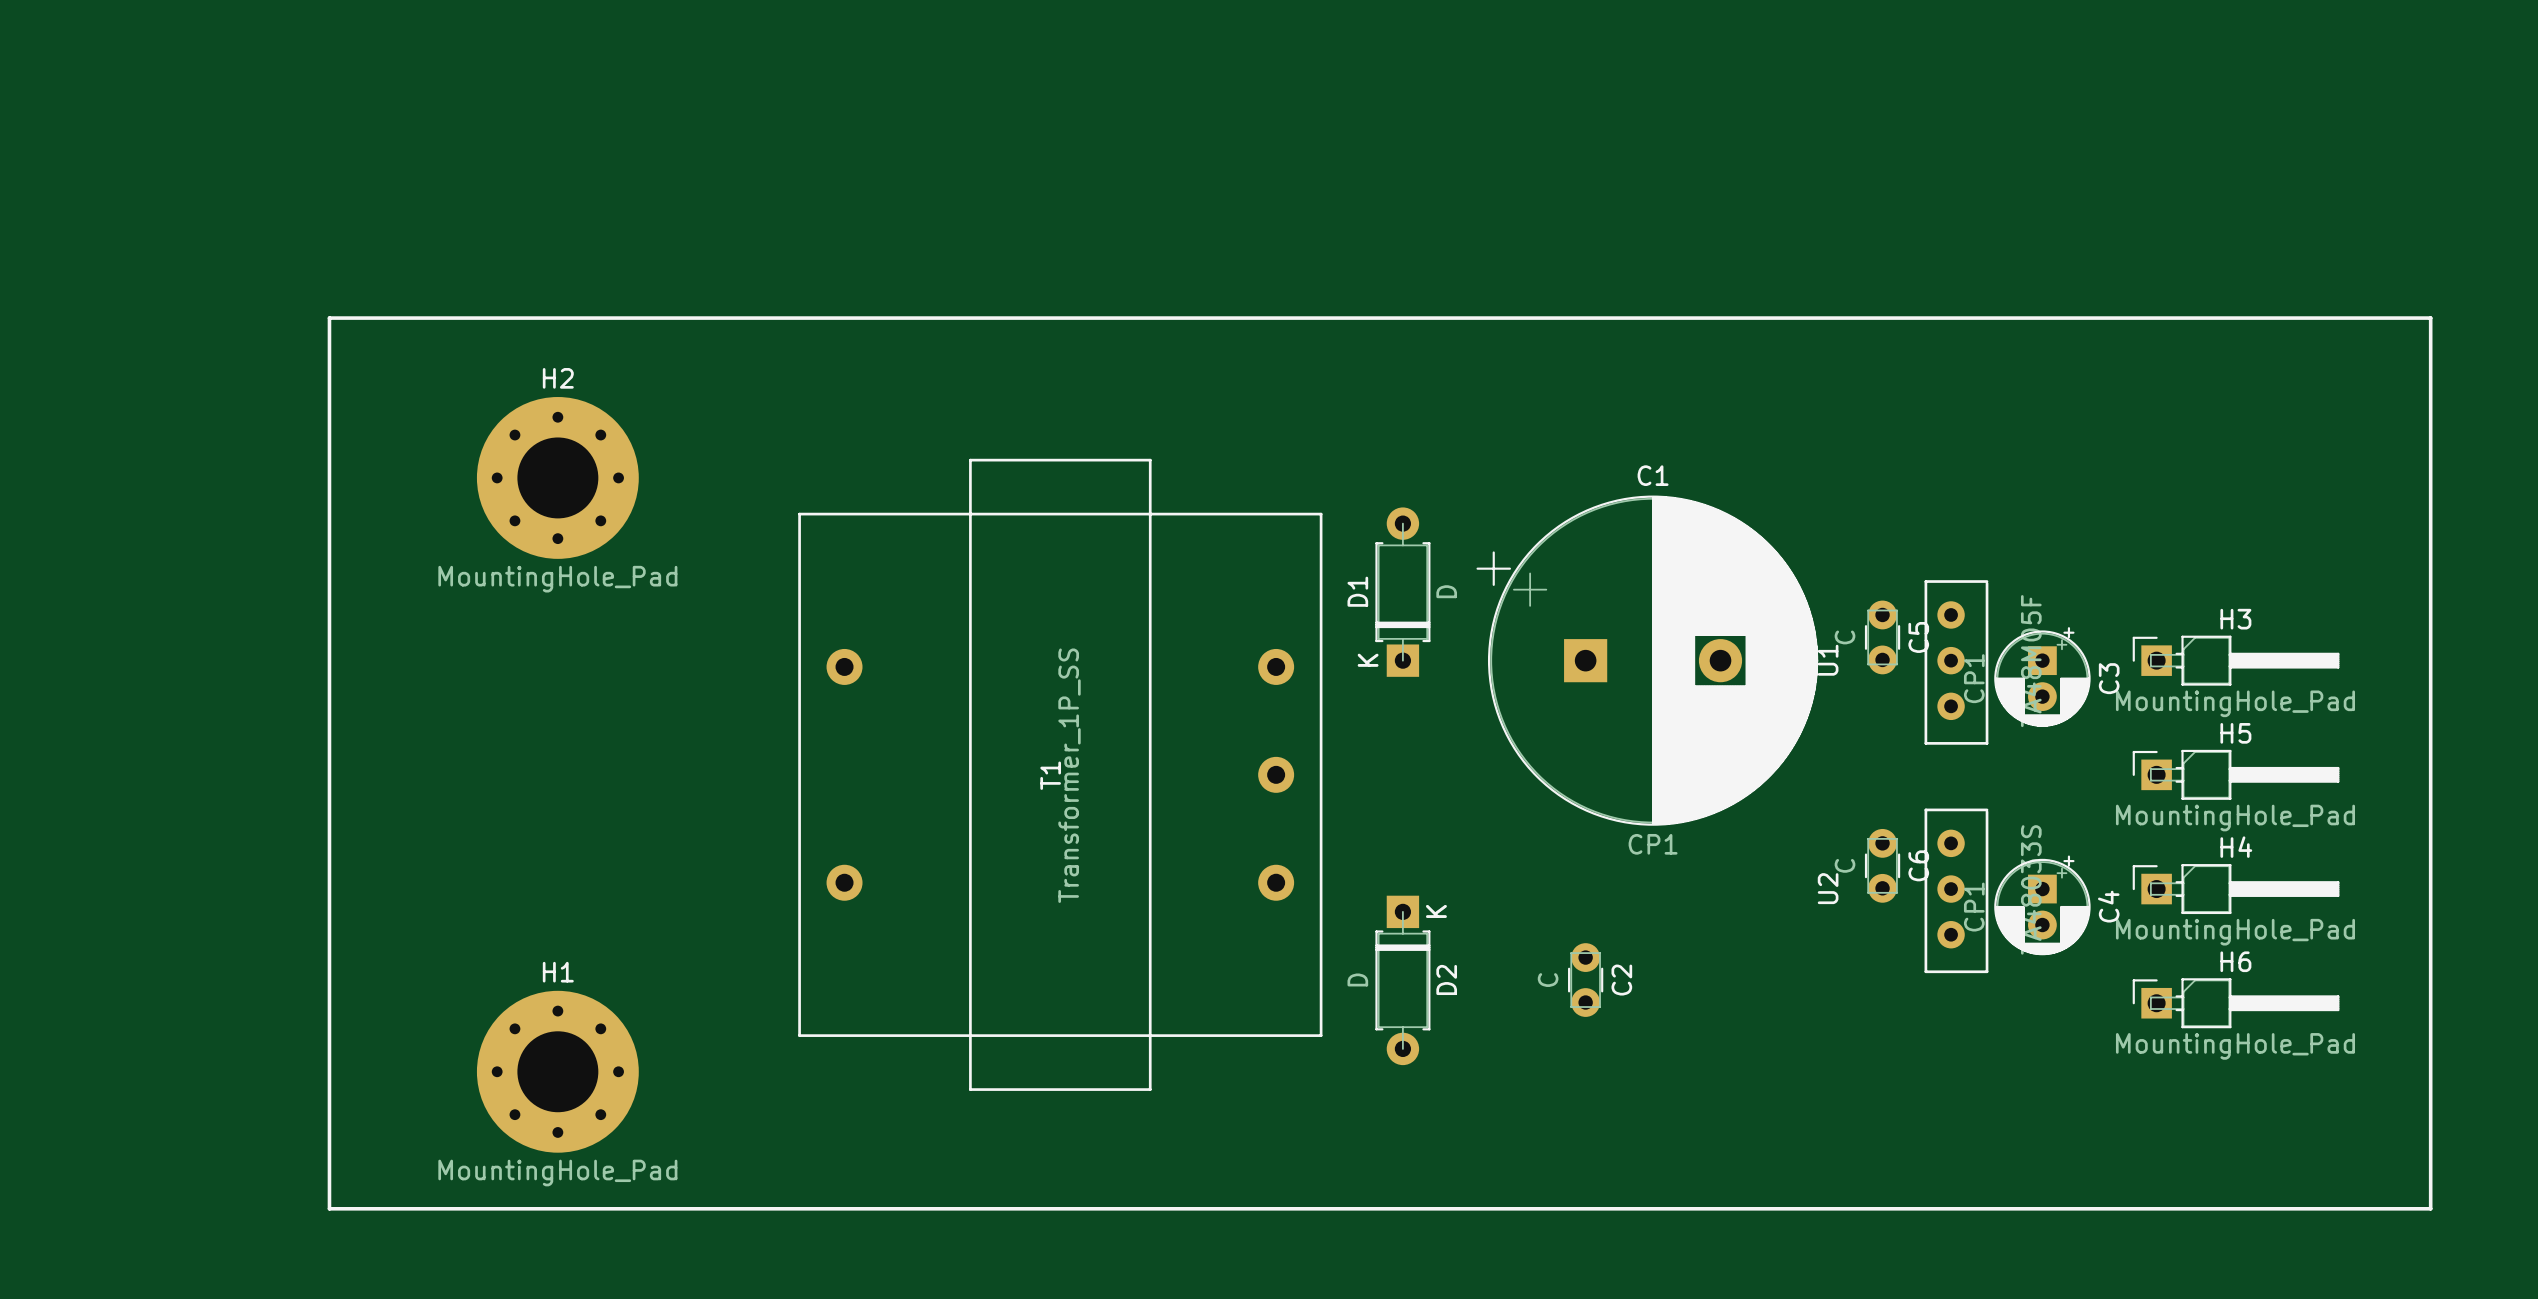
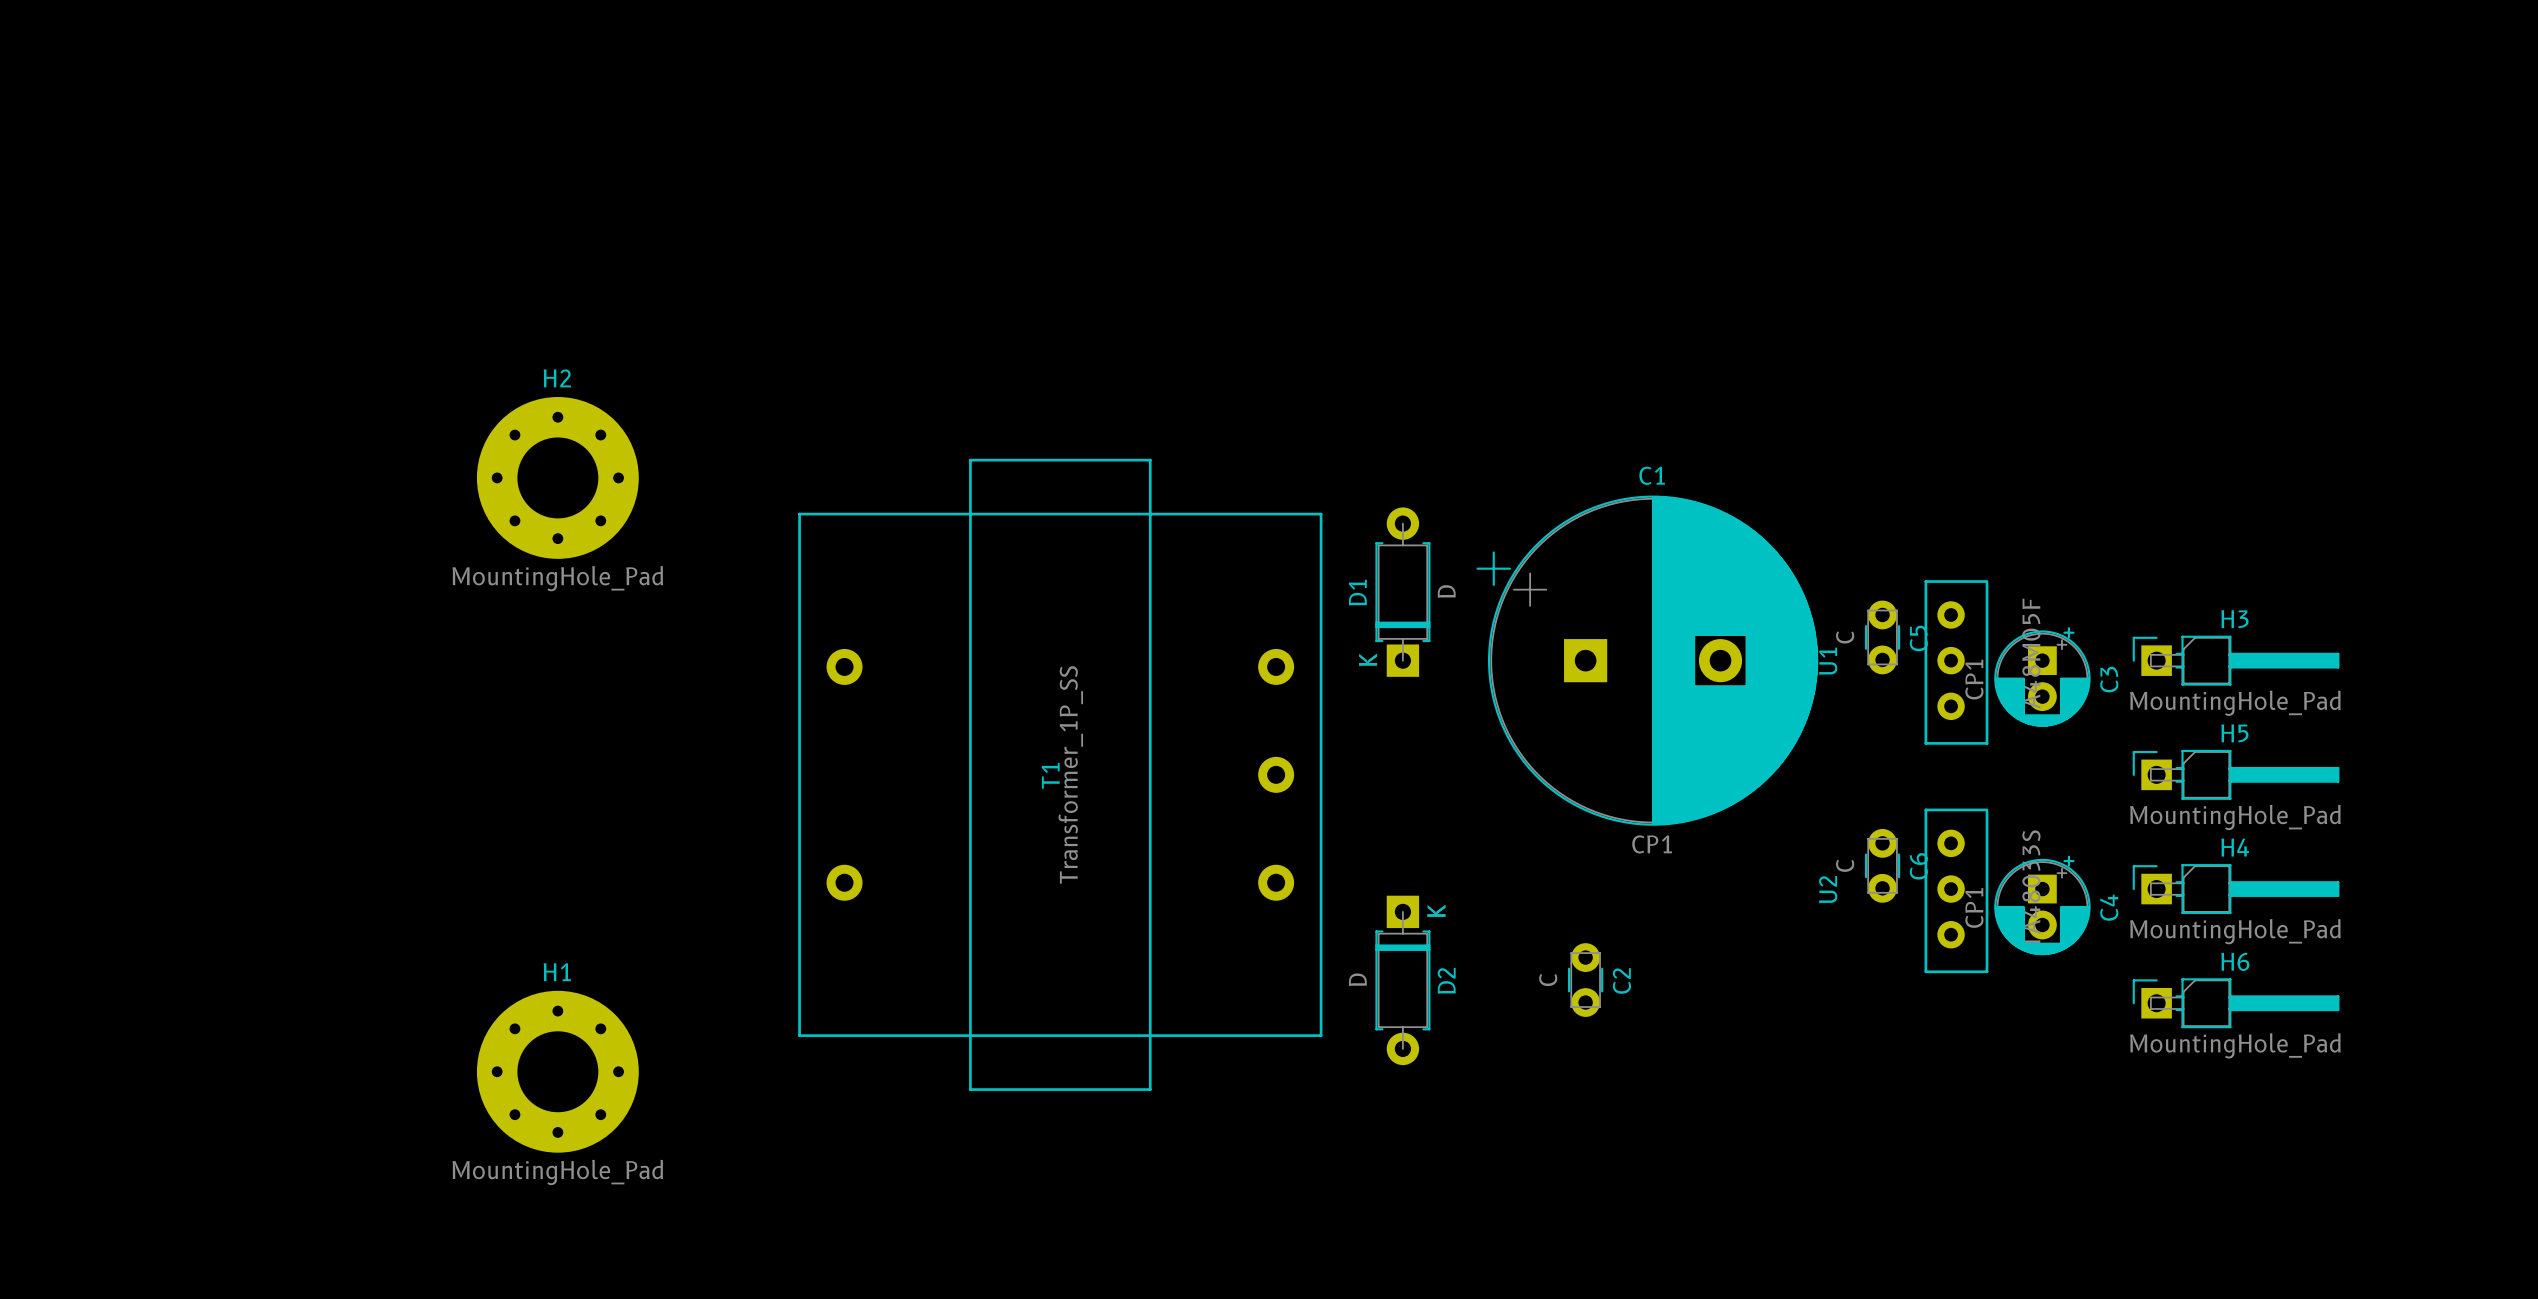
line: (329, 318) (2430, 318) (2430, 1208) (329, 1208) (329, 318) -> none

